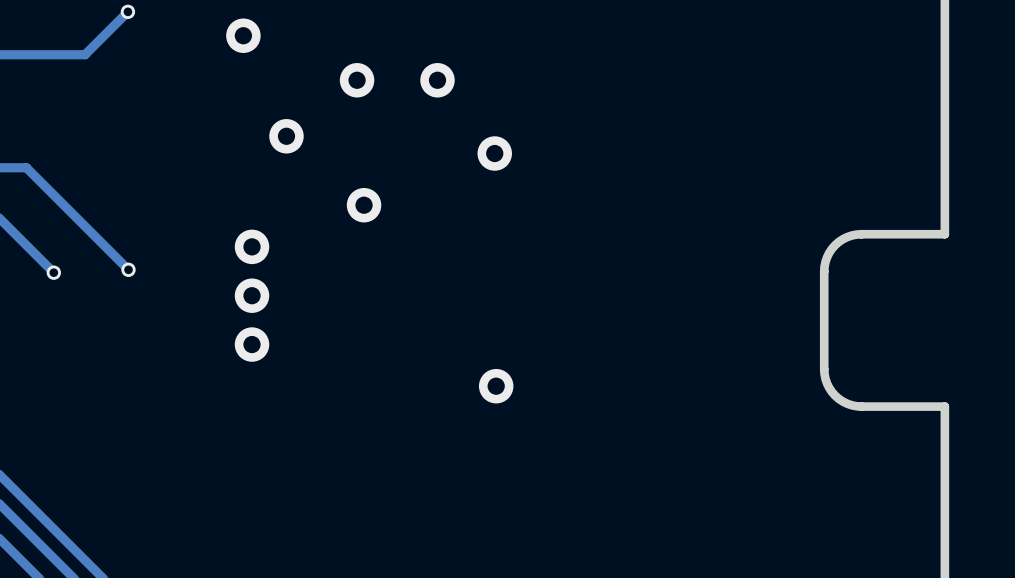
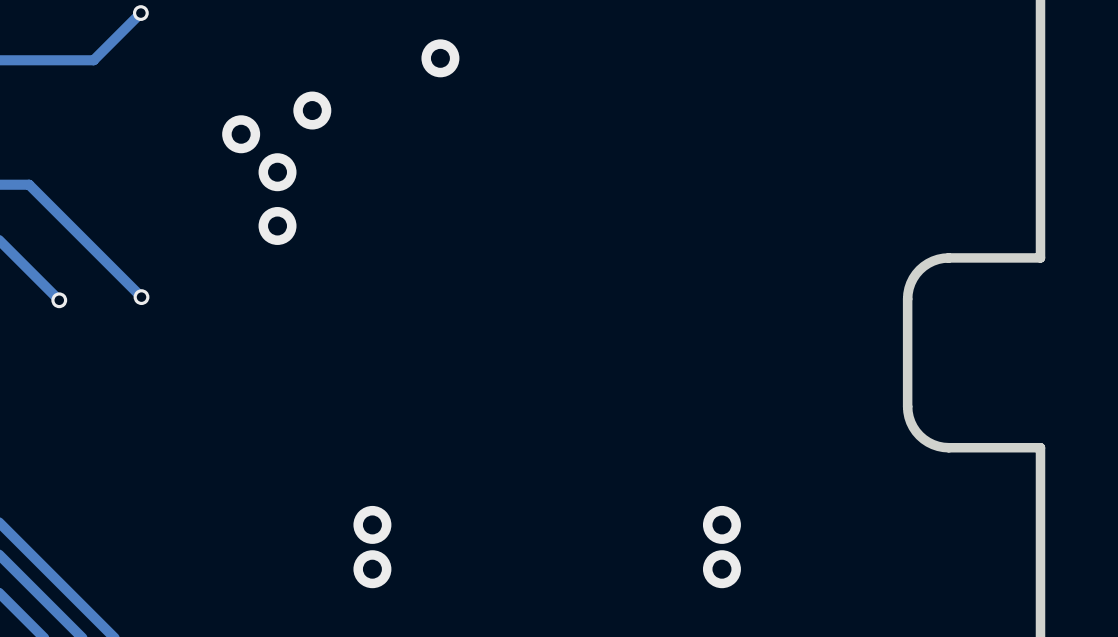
via: (243, 35) -> none
via: none -> (440, 58)
via: (357, 80) -> none
via: (437, 80) -> none
via: none -> (312, 110)
via: none -> (241, 134)
via: (286, 136) -> none
via: (494, 153) -> none
via: none -> (277, 172)
via: none -> (277, 225)
via: (364, 205) -> none
via: (252, 246) -> none
via: (252, 295) -> none
via: (252, 344) -> none
via: (496, 386) -> none
via: none -> (372, 524)
via: none -> (721, 524)
via: none -> (372, 569)
via: none -> (721, 569)

